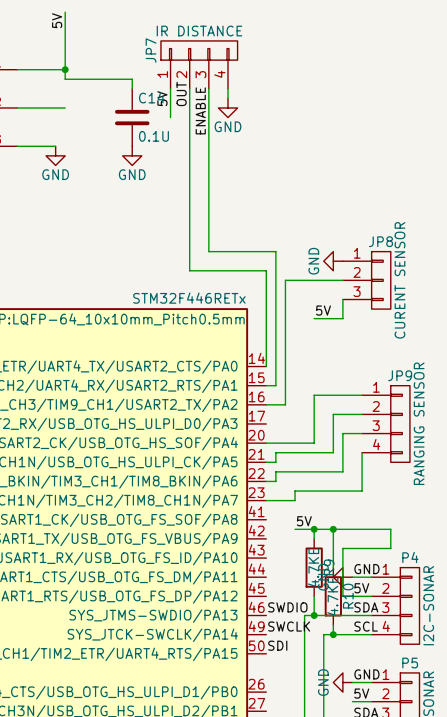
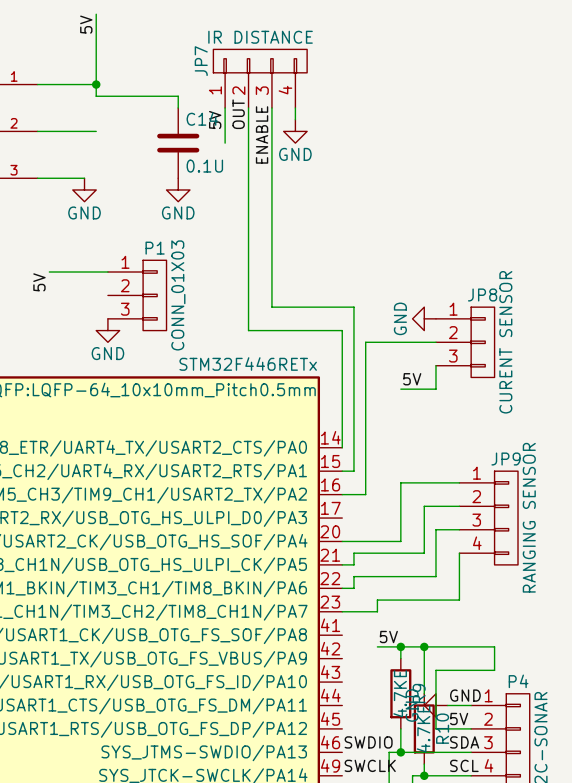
wire: none -> (49, 272) (107, 272)
label: none -> 5V (39, 282)
P1: none -> CONN_01X03 (137, 295)
power symbol: none -> GND (107, 330)

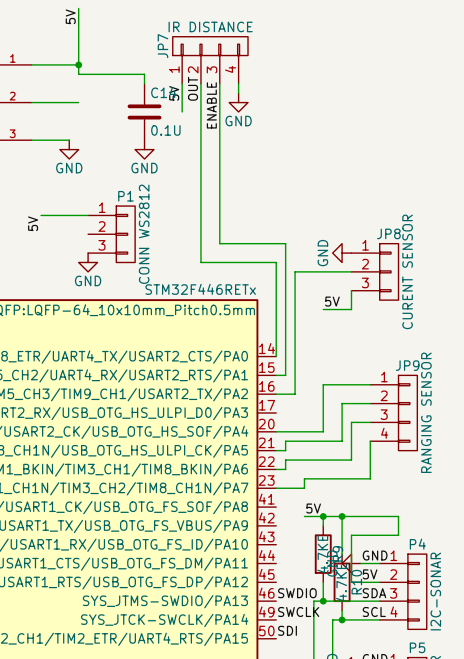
P1 value: CONN_01X03 (178, 295) -> CONN WS2812 (144, 234)

